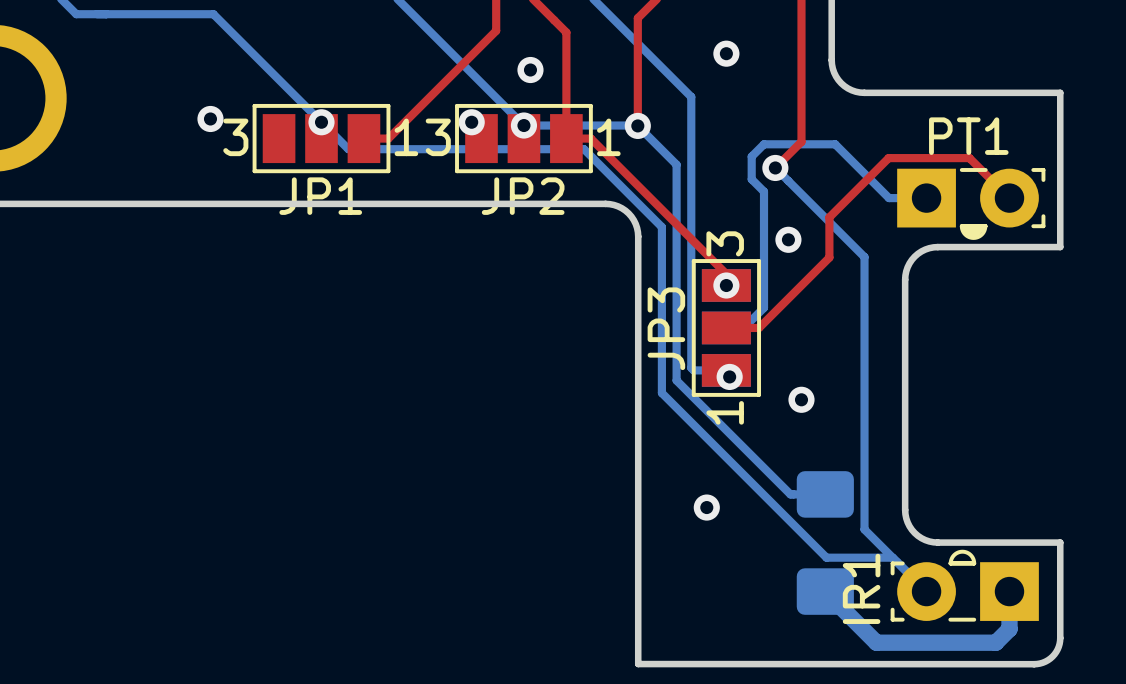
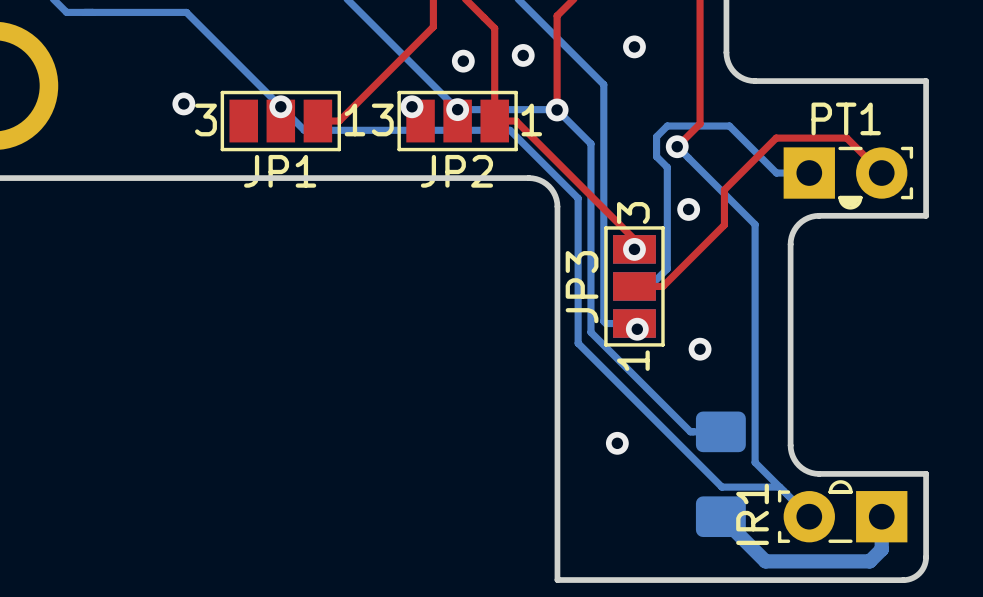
via: none -> (523, 55)

